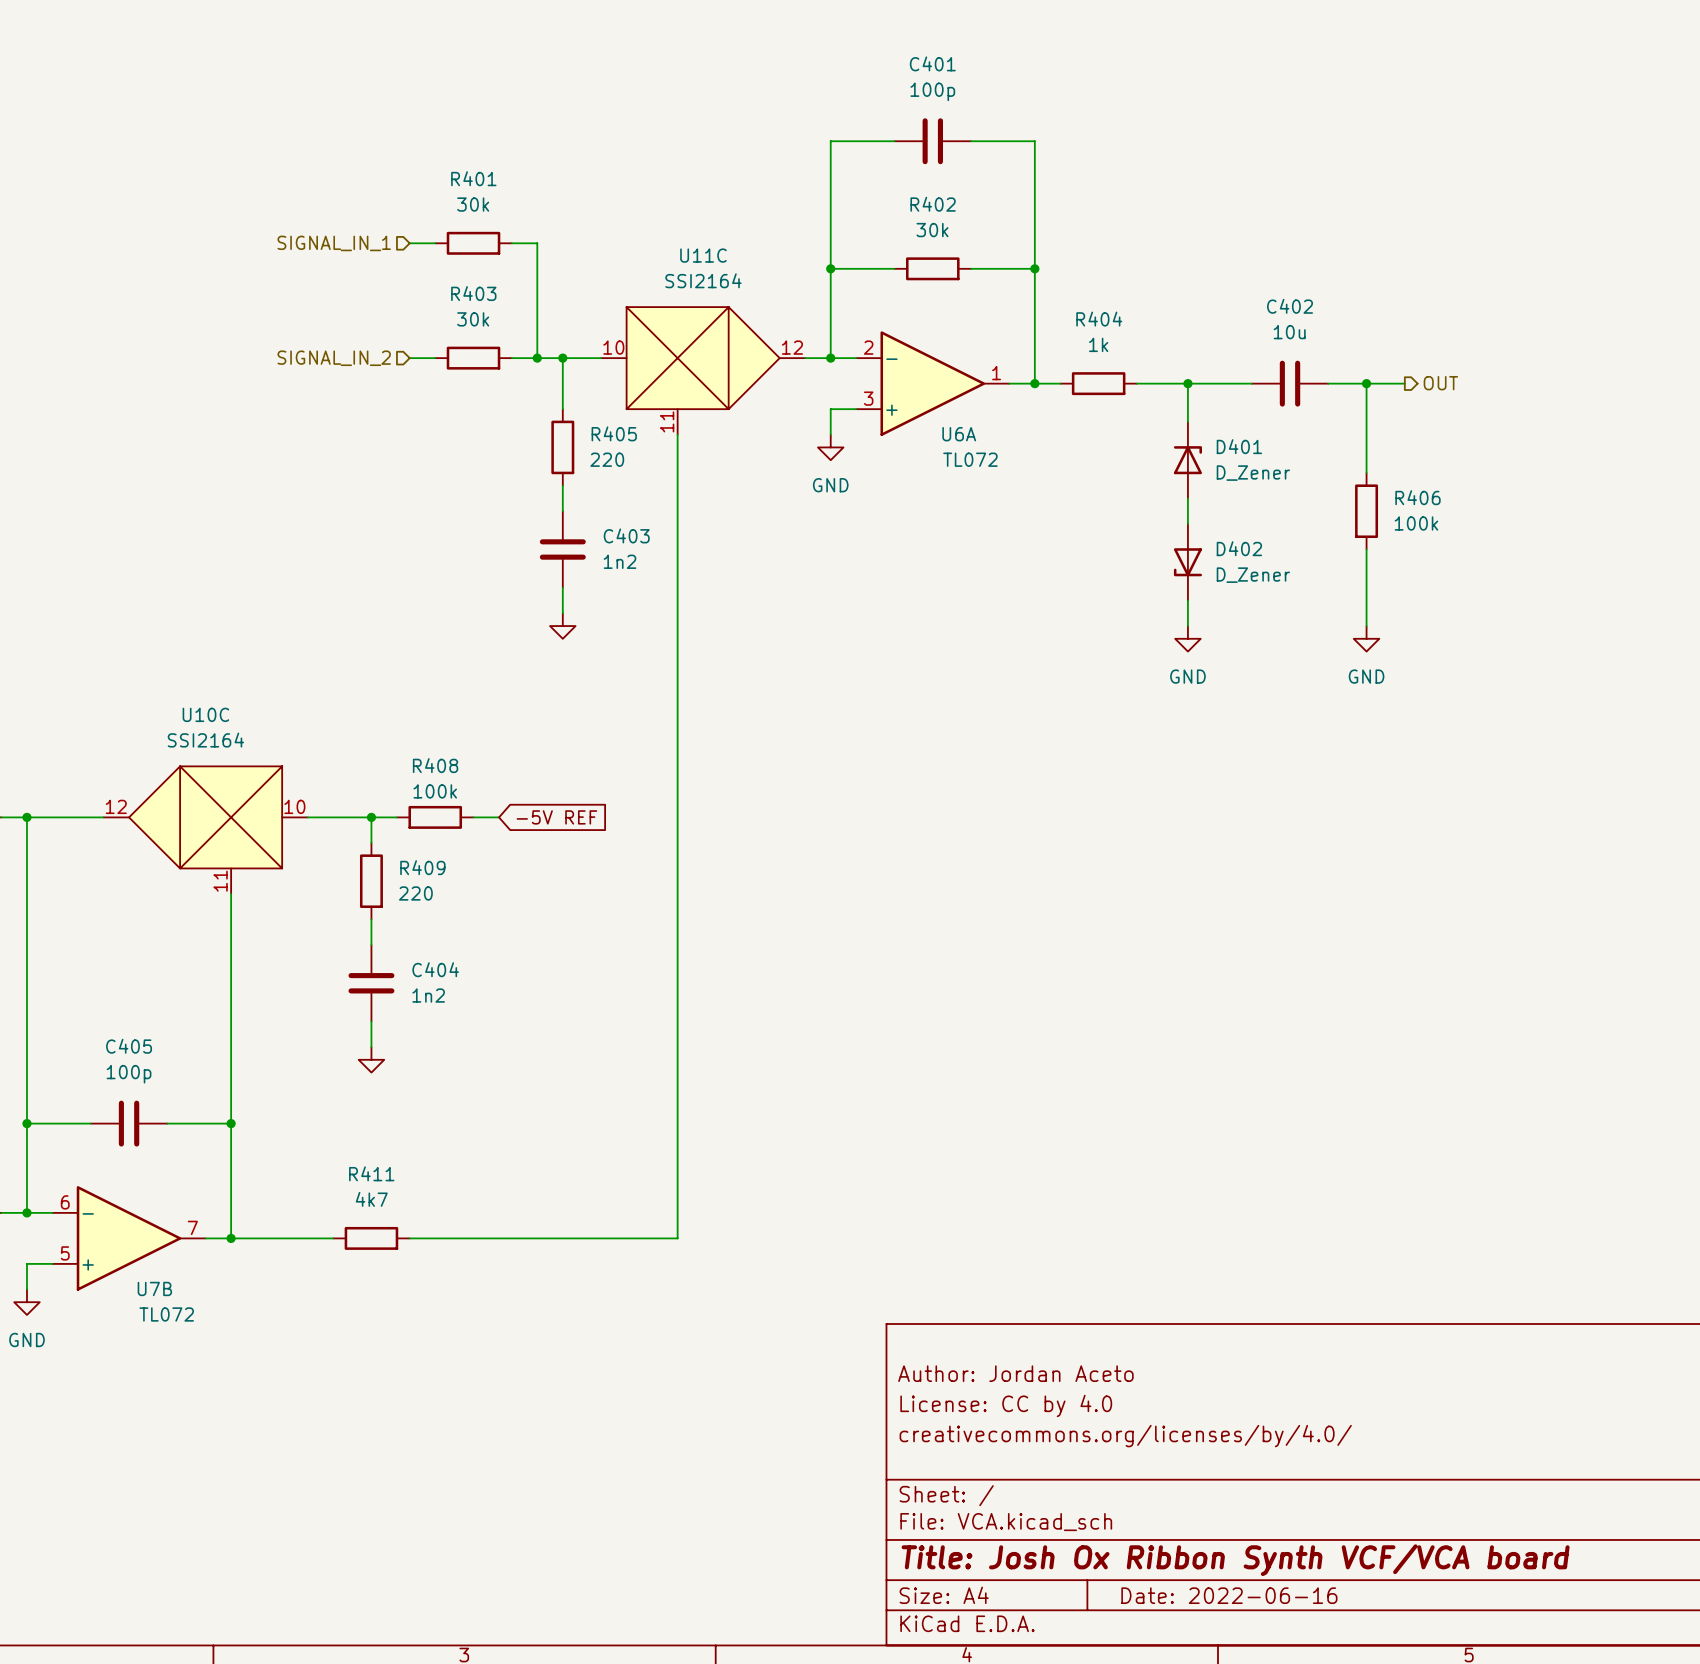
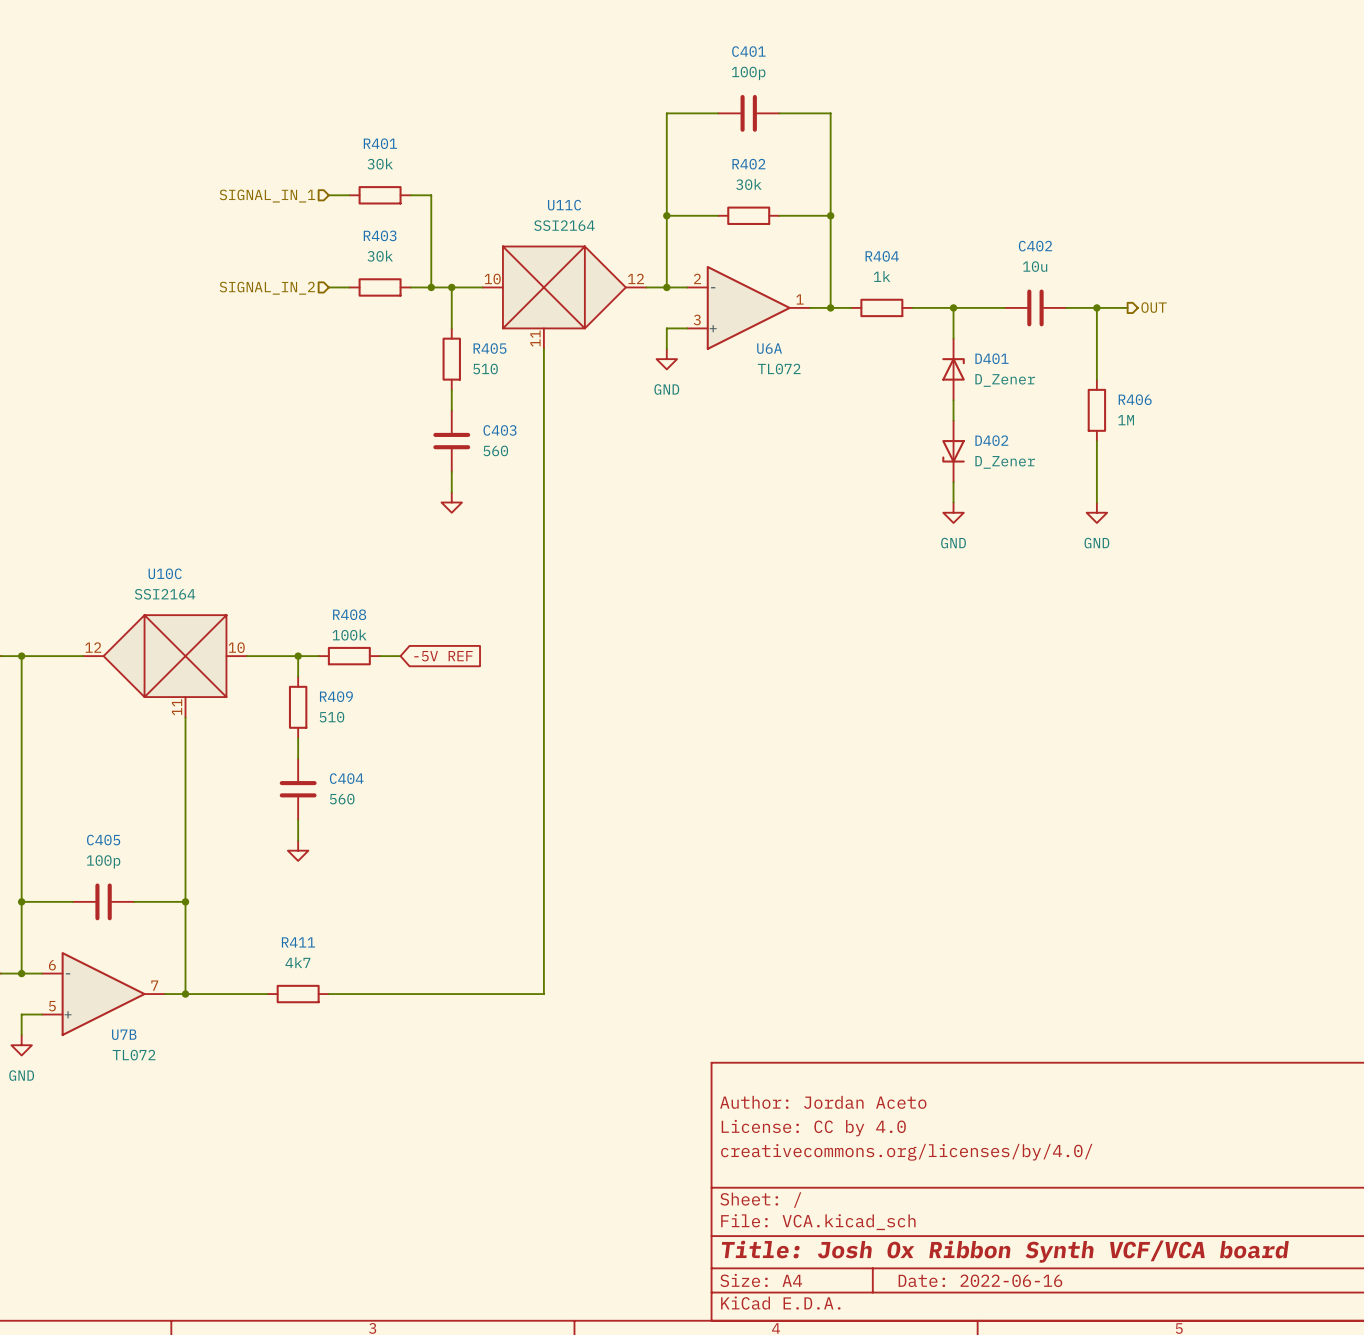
R405 value: 220 (607, 459) -> 510 (485, 368)
R406 value: 100k (1416, 523) -> 1M (1126, 420)
C403 value: 1n2 (620, 561) -> 560 (495, 450)
R409 value: 220 (415, 893) -> 510 (331, 717)
C404 value: 1n2 (428, 995) -> 560 (342, 799)

